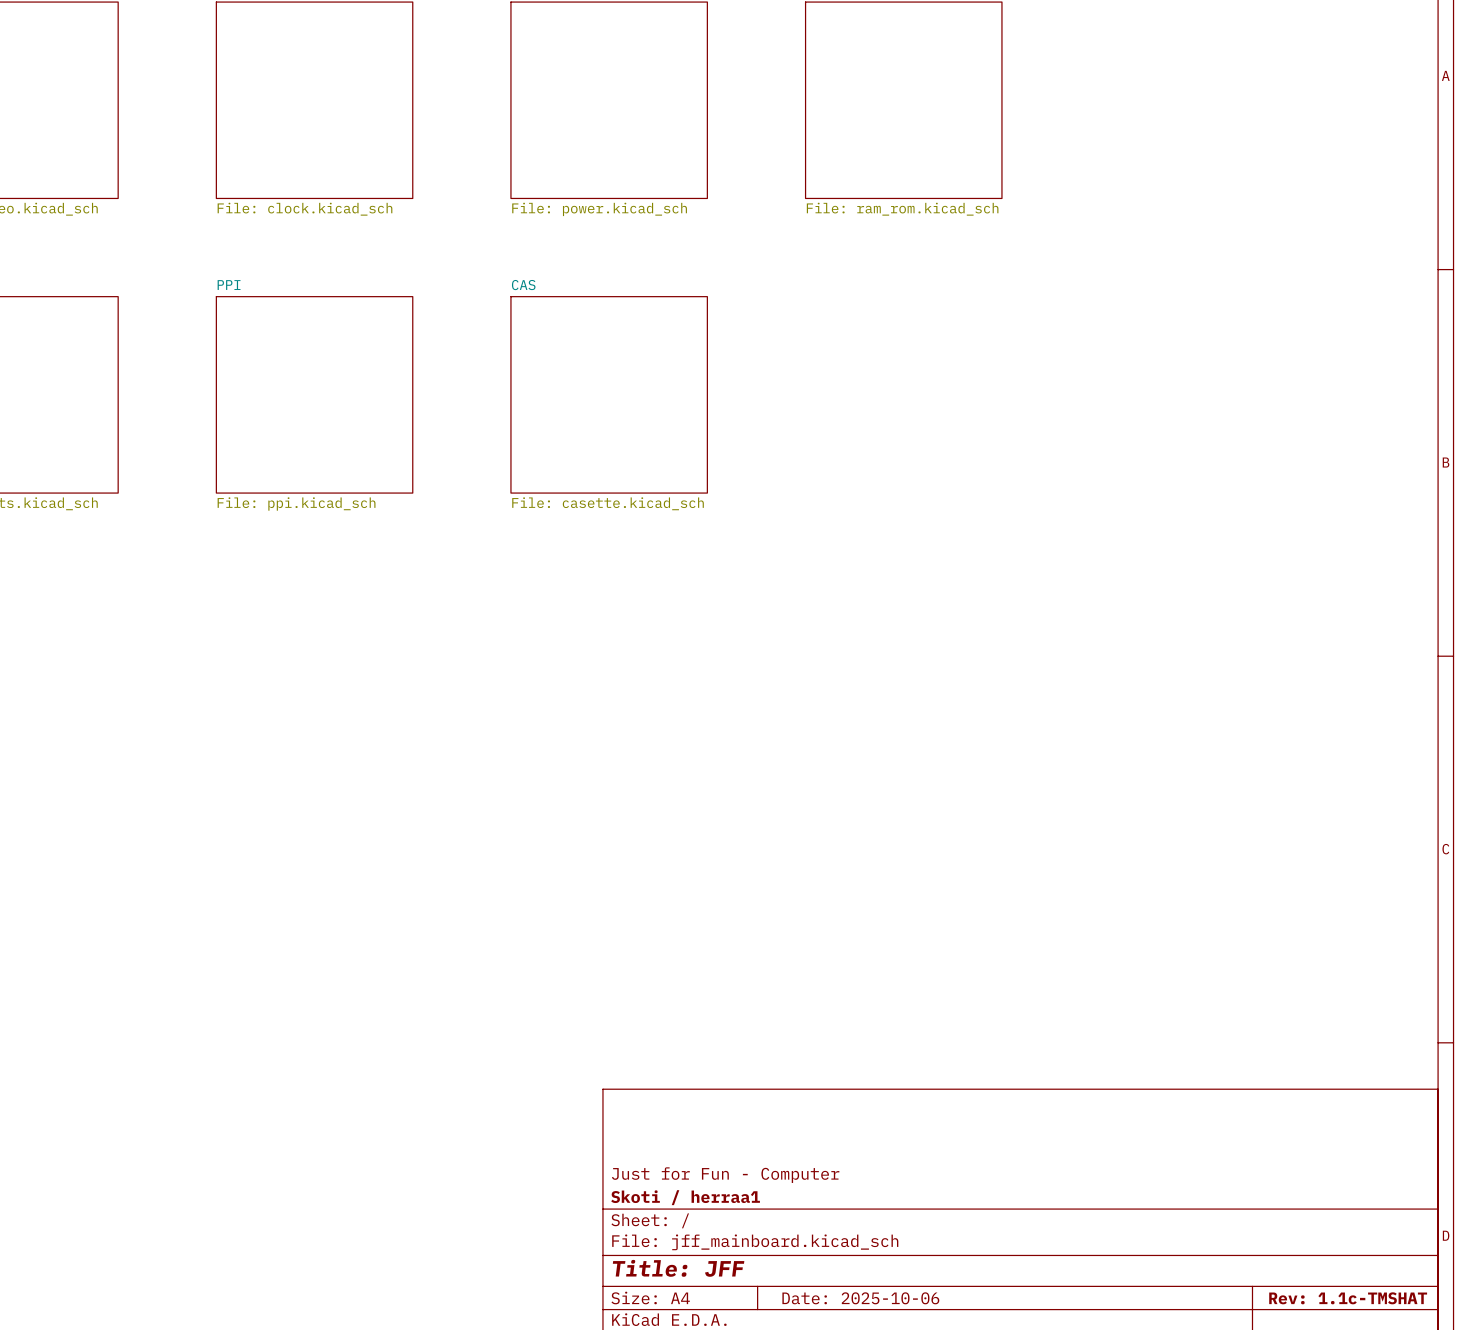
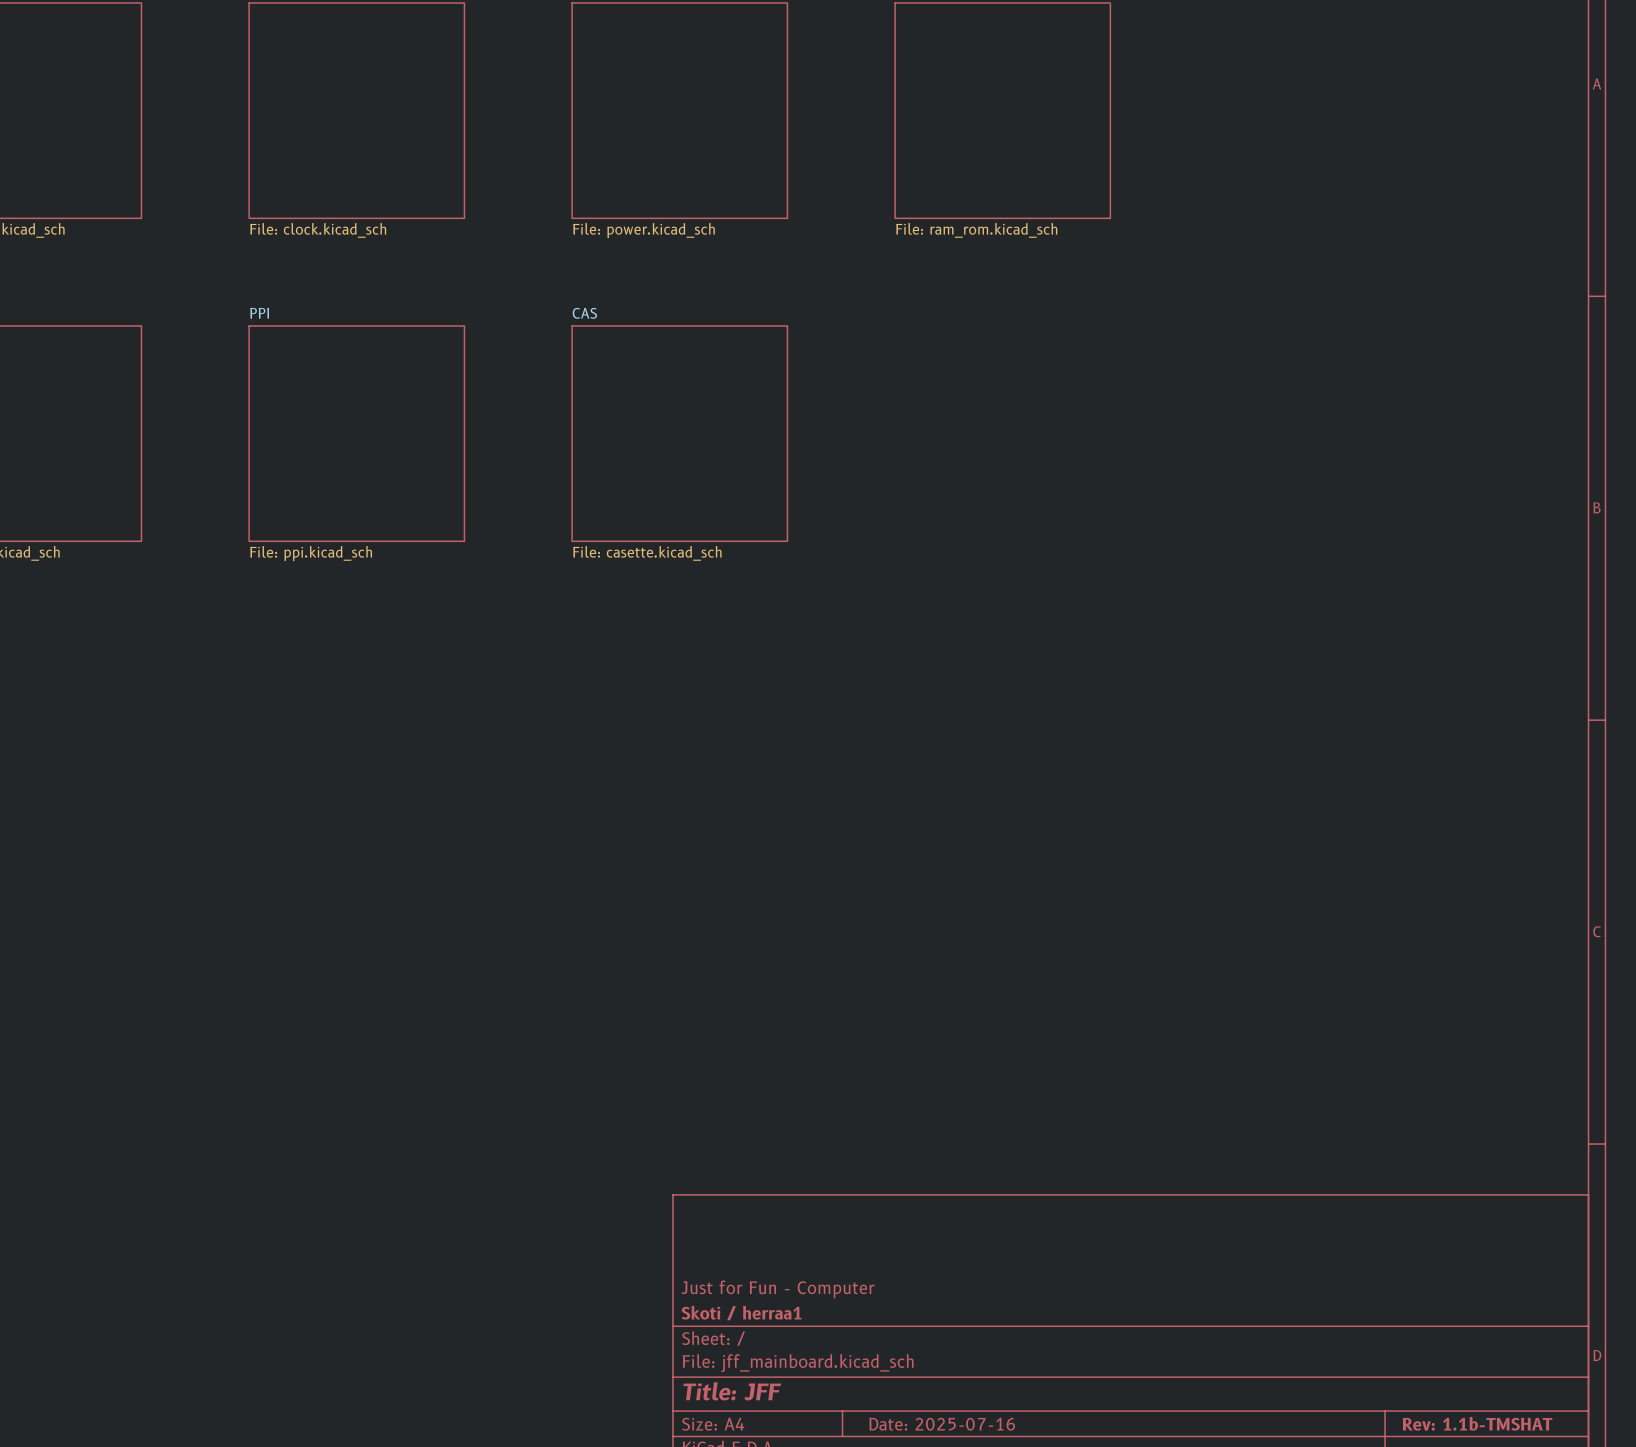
title block: Date: 2025-10-06 (860, 1298) -> Date: 2025-07-16 (942, 1424)
title block: Rev: 1.1c-TMSHAT (1348, 1298) -> Rev: 1.1b-TMSHAT (1477, 1423)

